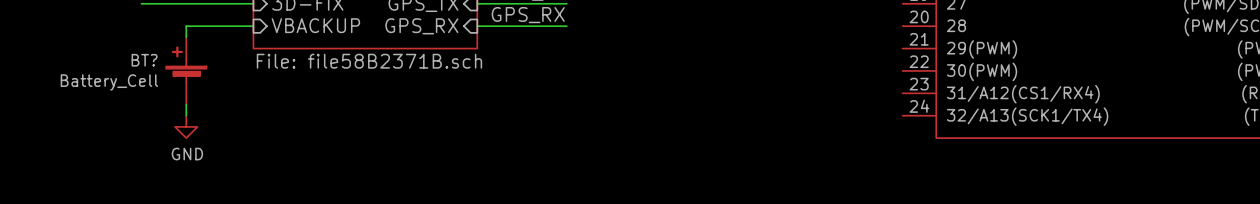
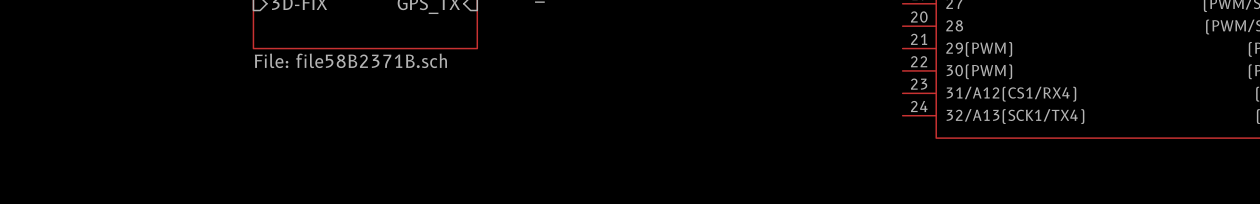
wire: (141, 3) (253, 3) -> none
wire: (477, 3) (566, 3) -> none
label: GPS_RX (528, 15) -> none
sheet pin: VBACKUP (315, 25) -> none
wire: (253, 26) (186, 26) (186, 37) -> none
sheet pin: GPS_RX (421, 26) -> none
wire: (477, 26) (566, 26) -> none
BT?: Battery_Cell (186, 70) -> none
wire: (186, 104) (186, 115) -> none
power symbol: GND (186, 126) -> none

